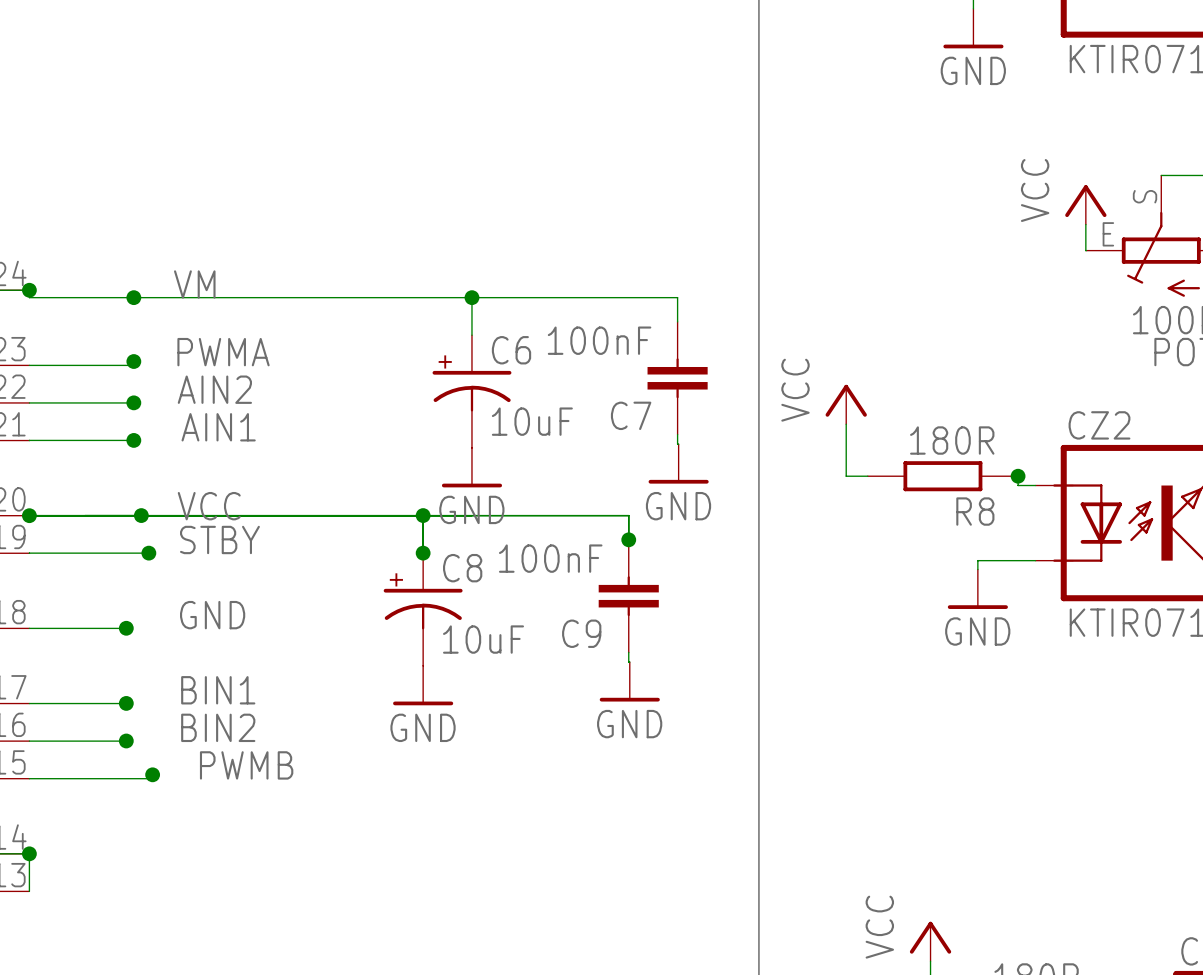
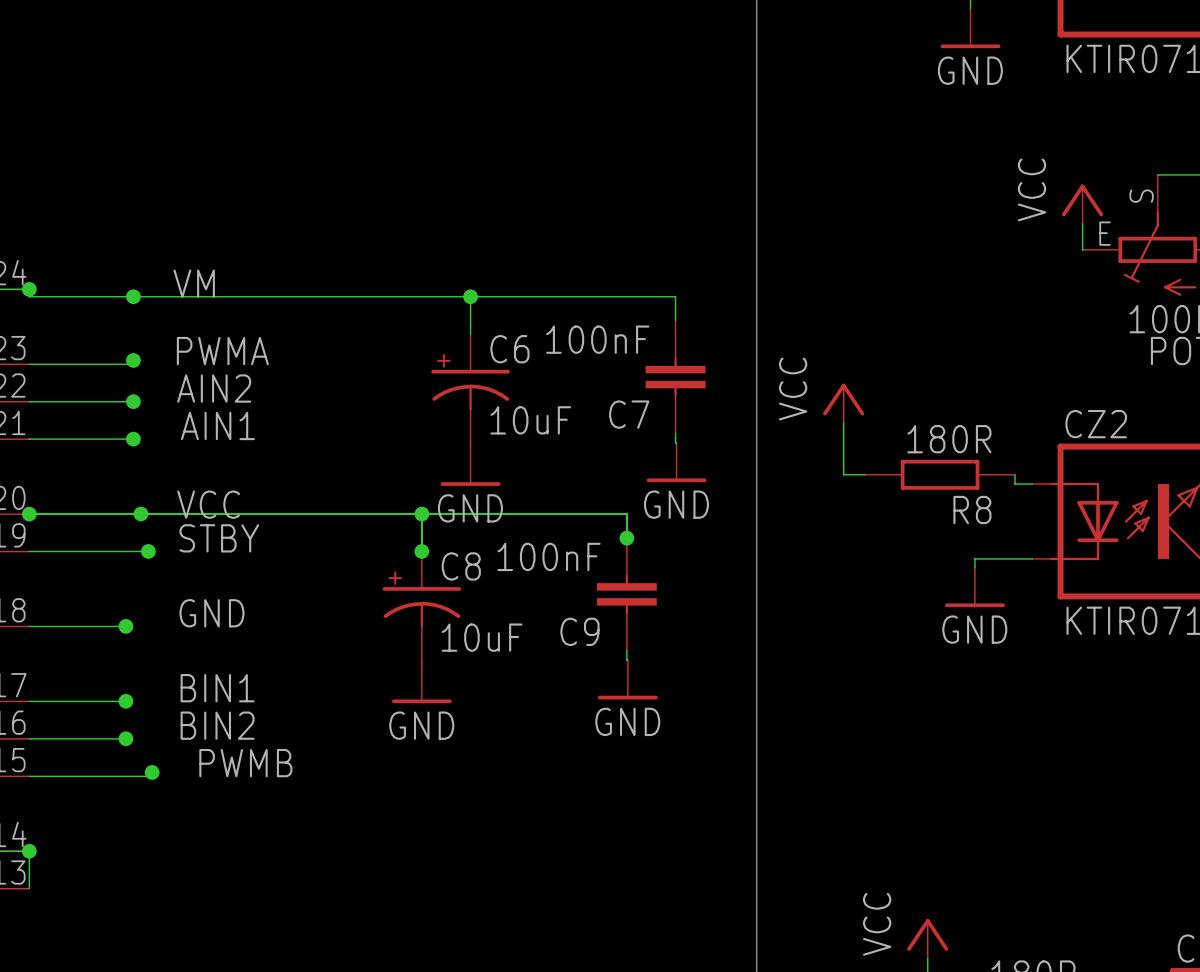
junction: (1018, 476) -> none

